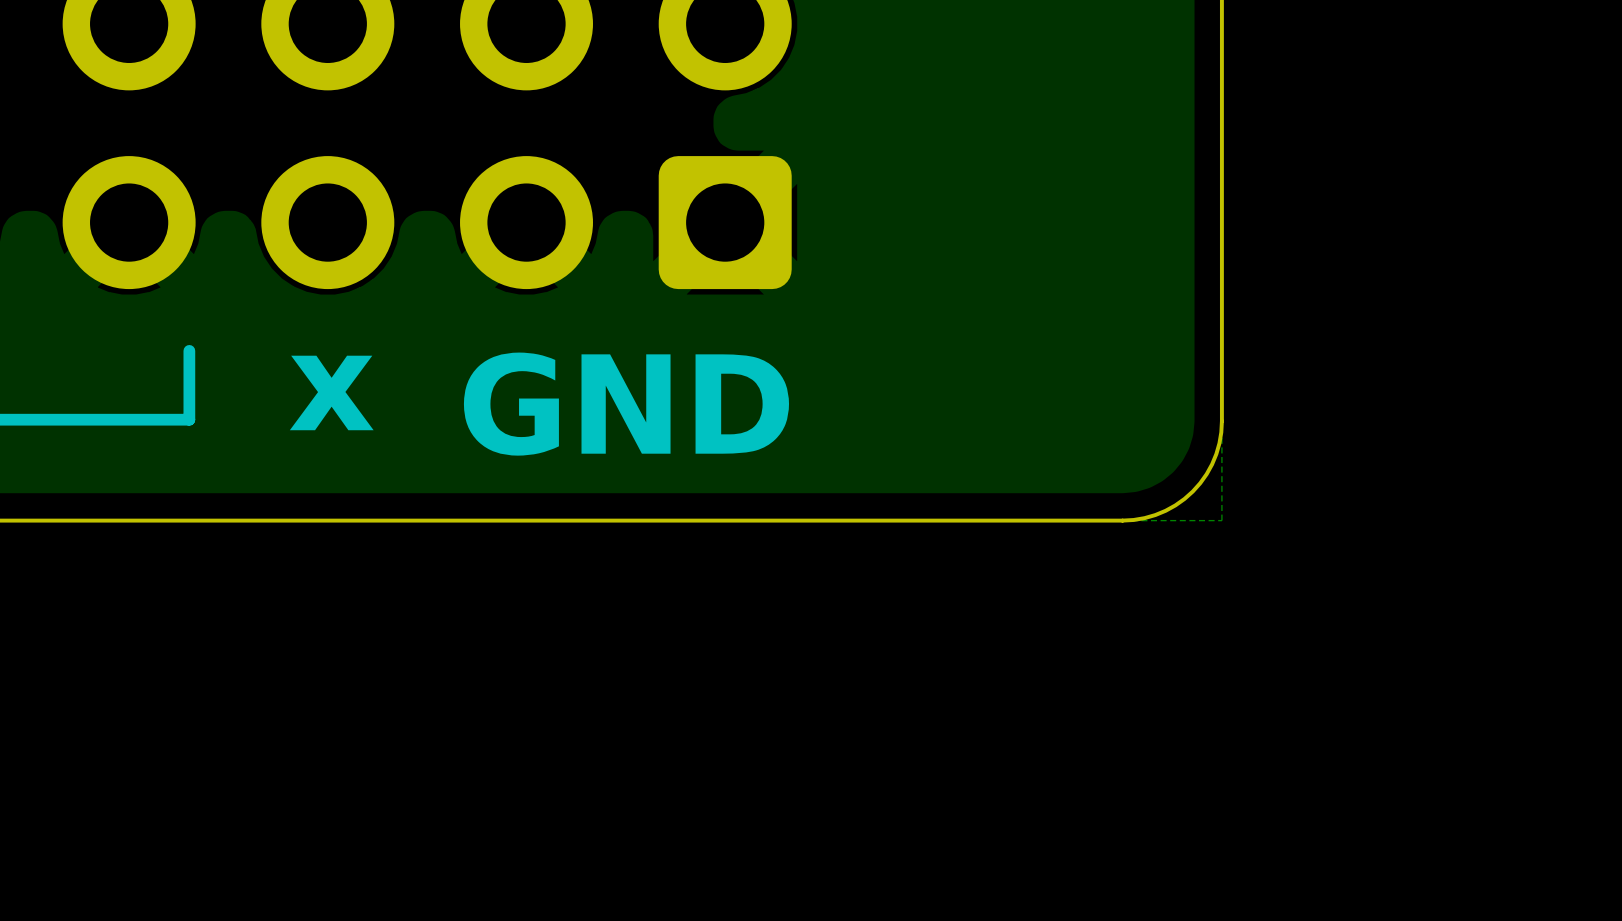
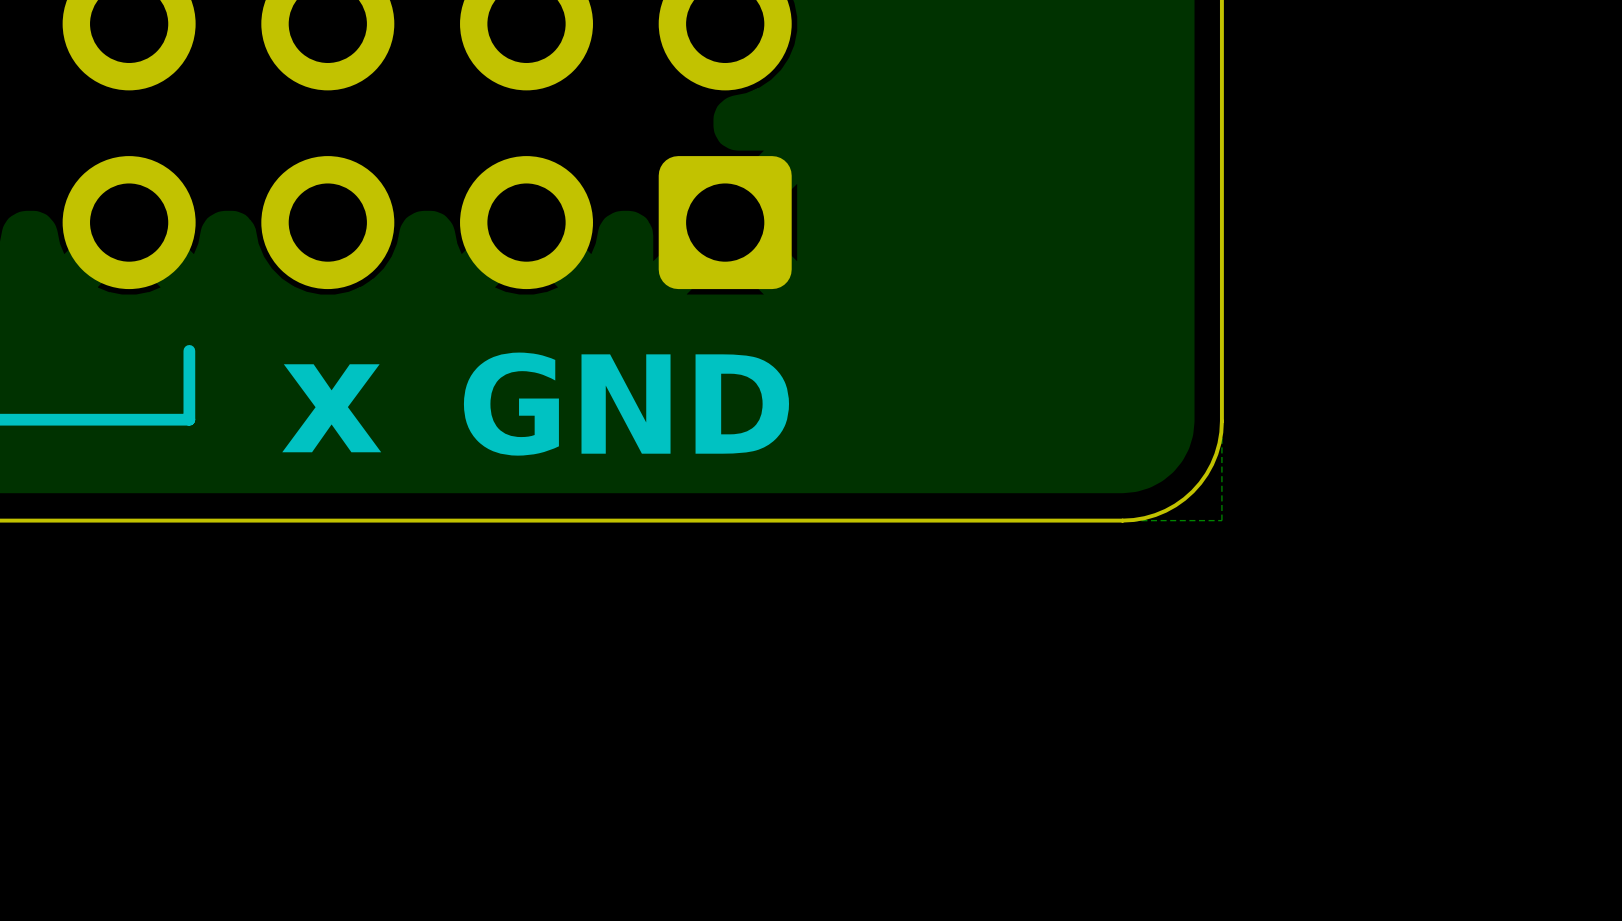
text position: x (331, 392) -> x (331, 408)

